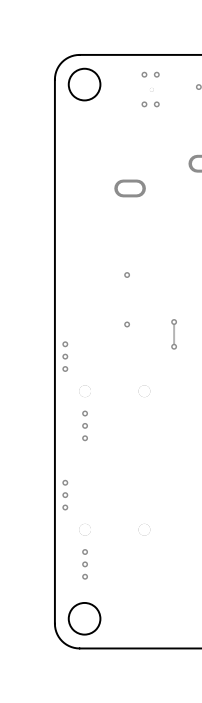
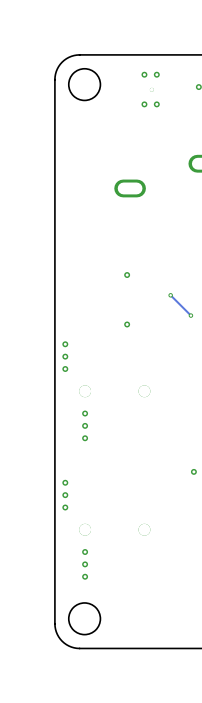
track: none -> (170, 295) (190, 315)
via: none -> (170, 295)
via: none -> (190, 315)
track: (174, 322) (174, 346) -> none
via: (174, 322) -> none
via: (174, 346) -> none
via: none -> (193, 471)

